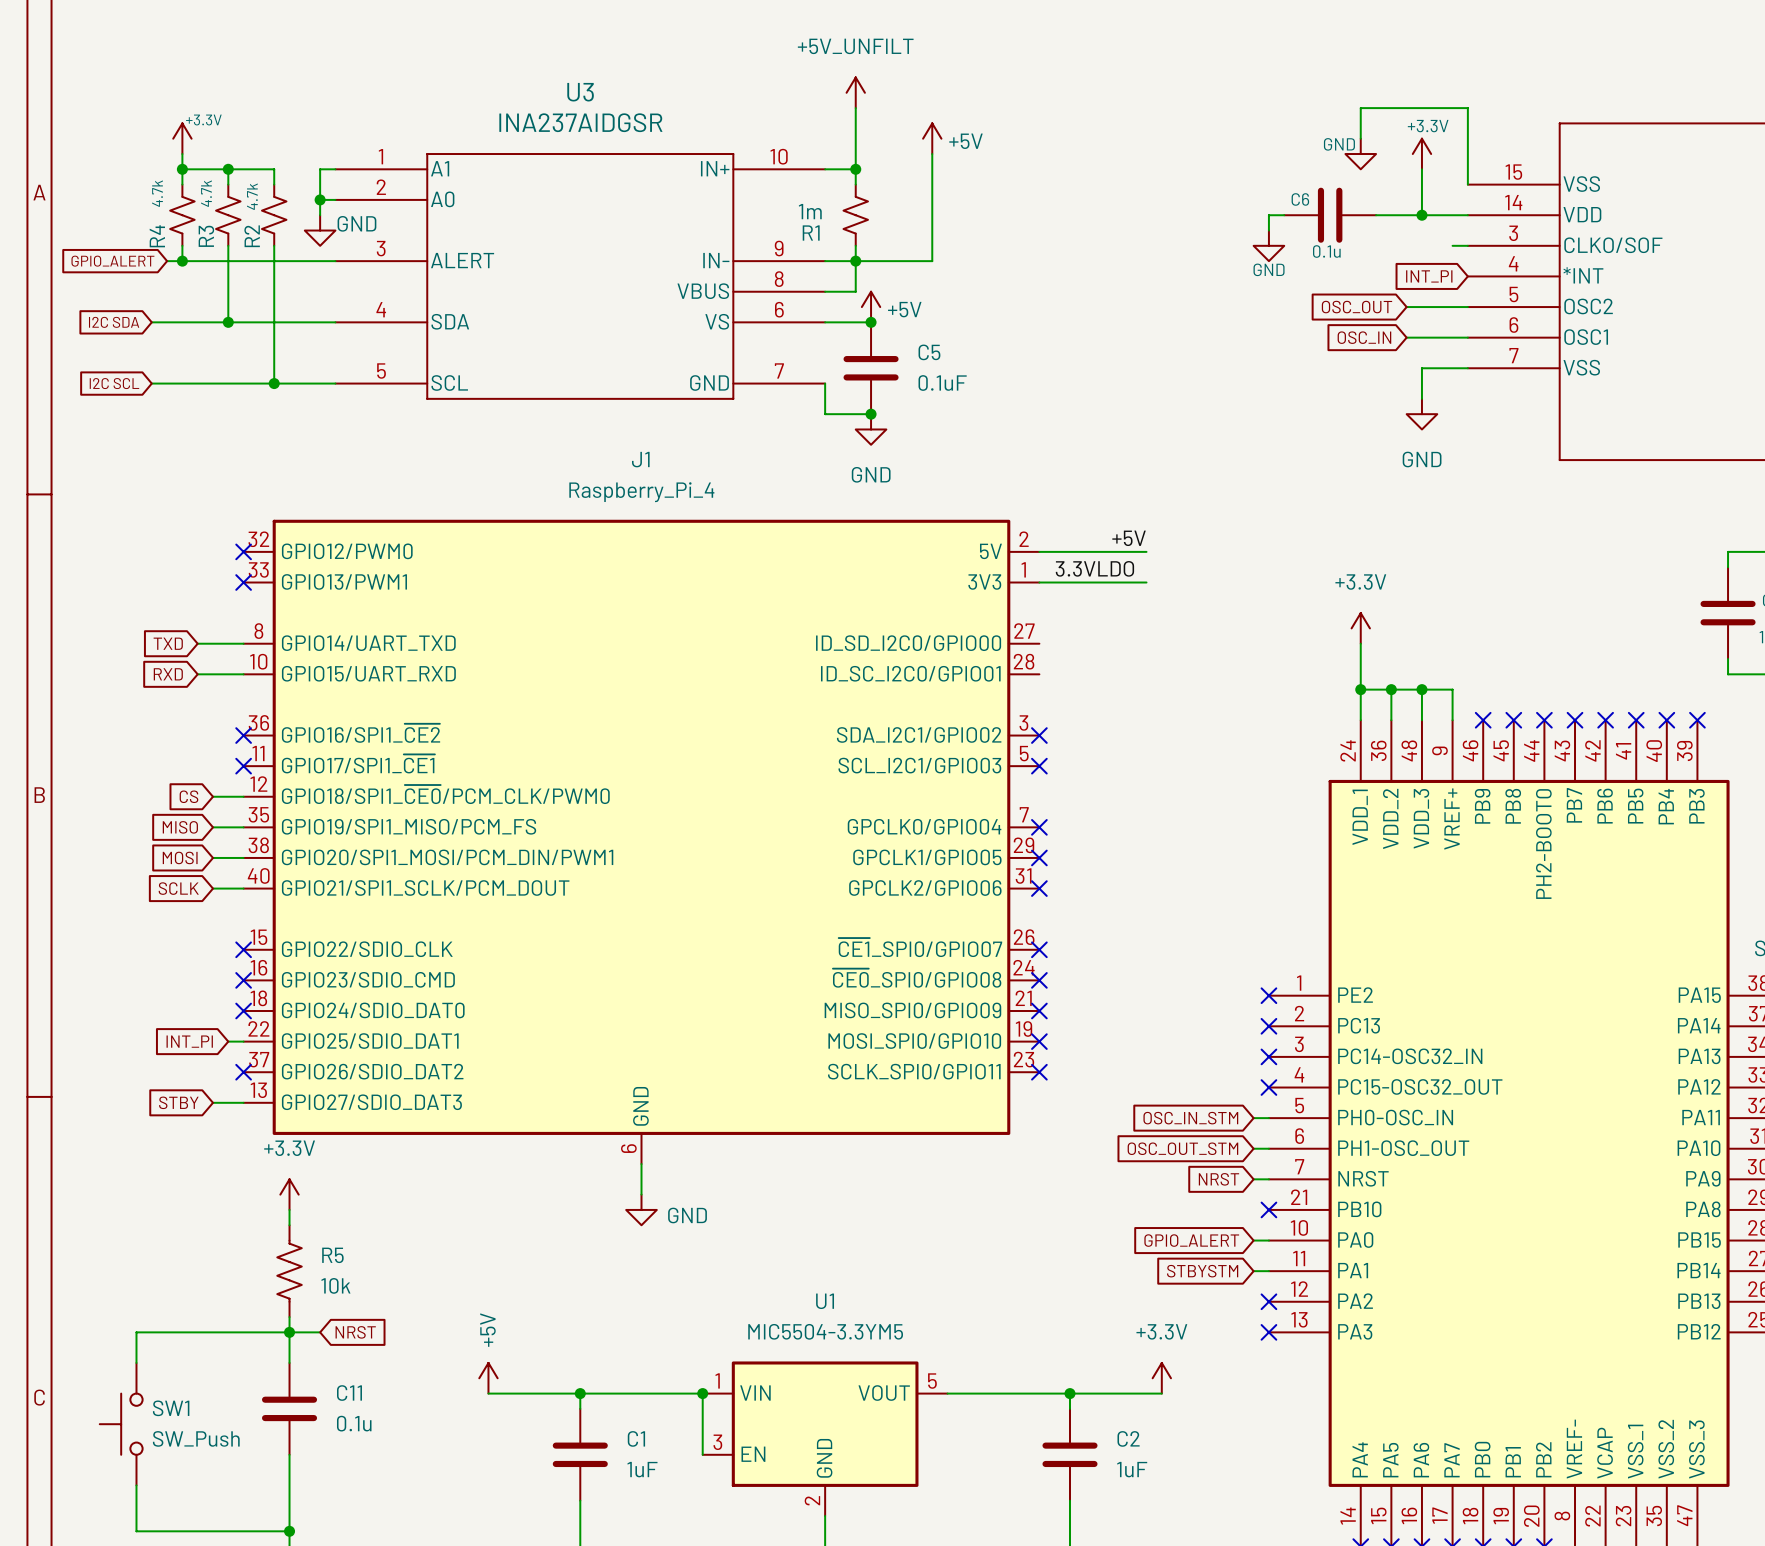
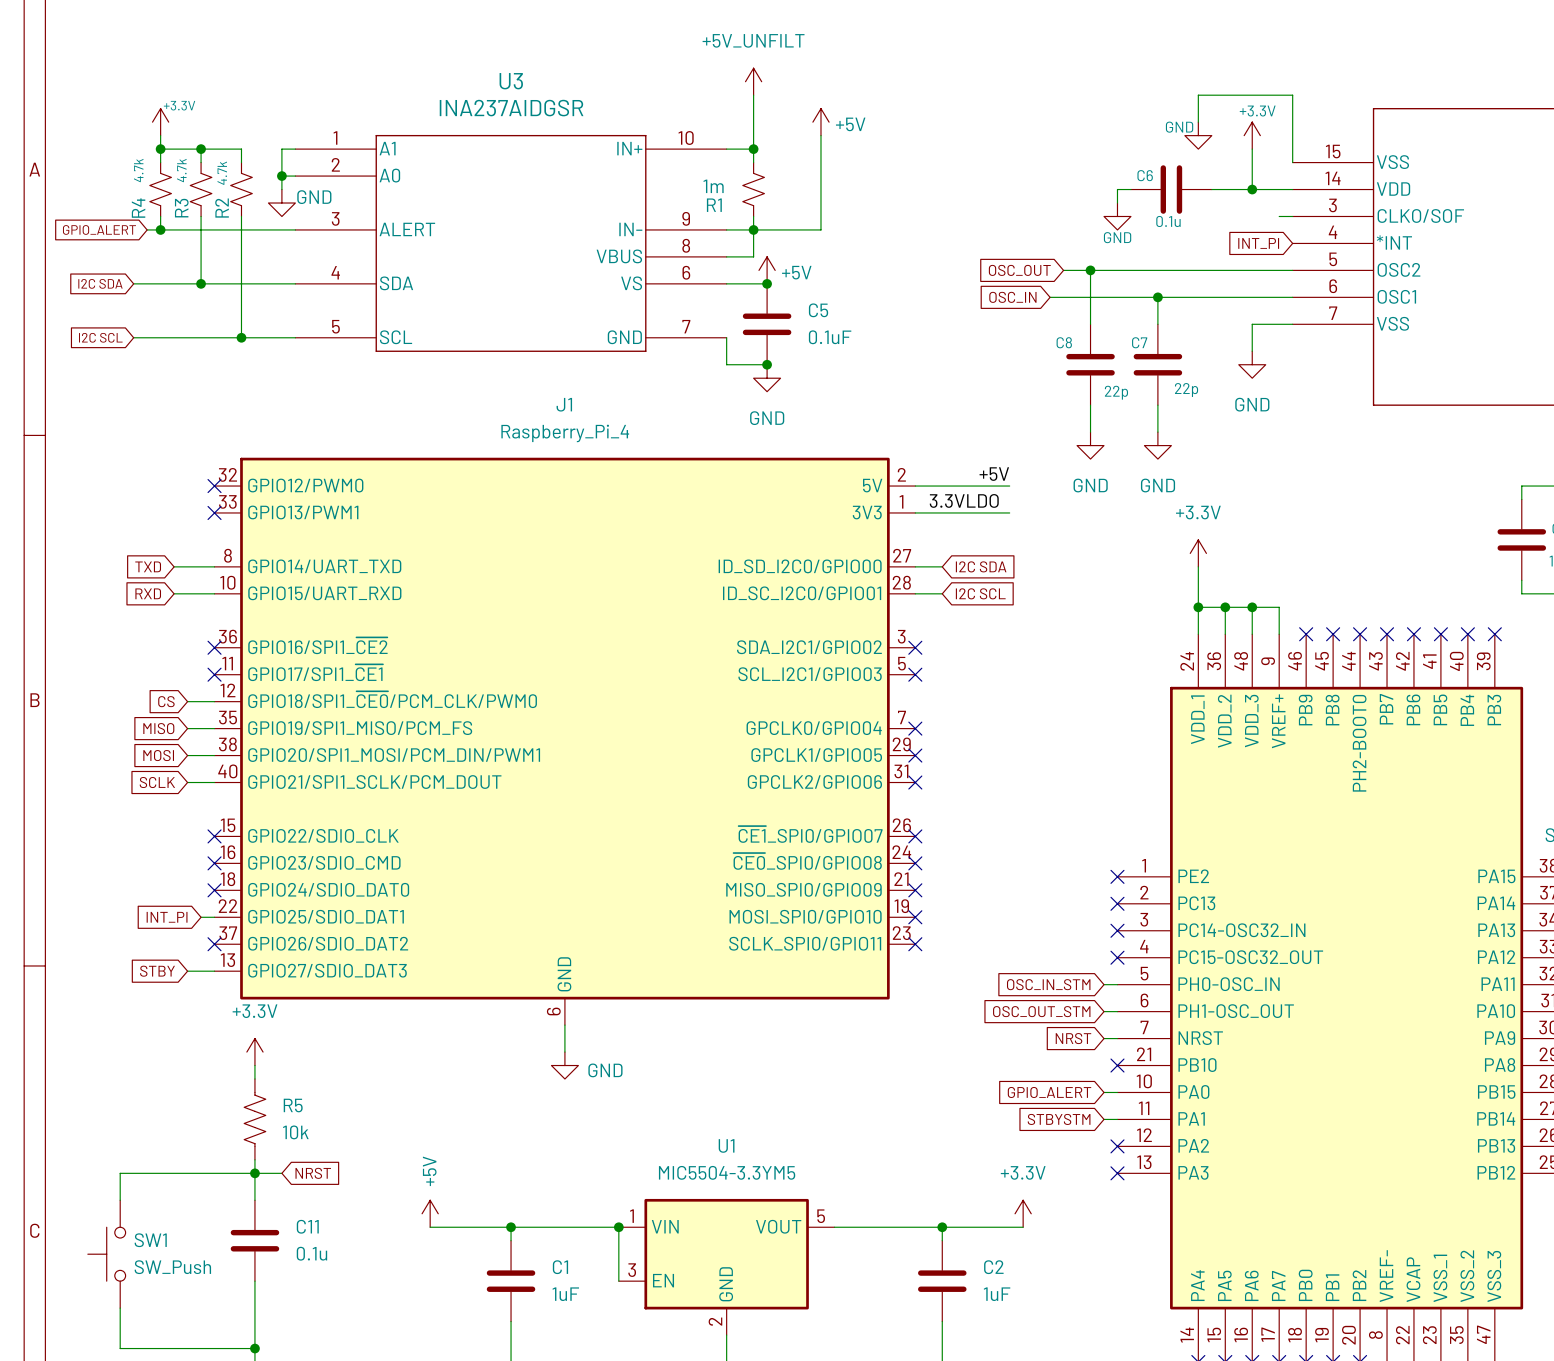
wire: none -> (1063, 270) (1238, 270)
wire: none -> (1090, 270) (1090, 324)
junction: none -> (1090, 270)
global label position: OSC_OUT (1356, 307) -> OSC_OUT (1019, 270)
wire: none -> (1050, 297) (1238, 297)
wire: none -> (1157, 297) (1157, 324)
junction: none -> (1157, 297)
global label position: OSC_IN (1364, 337) -> OSC_IN (1012, 297)
C8: none -> 22p (1090, 364)
C7: none -> 22p (1157, 364)
wire: none -> (1090, 405) (1090, 432)
wire: none -> (1157, 405) (1157, 432)
power symbol: none -> GND (1090, 445)
power symbol: none -> GND (1157, 445)
wire: none -> (915, 566) (942, 566)
global label: none -> I2C SDA (981, 566)
wire: none -> (915, 593) (942, 593)
global label: none -> I2C SCL (980, 593)

